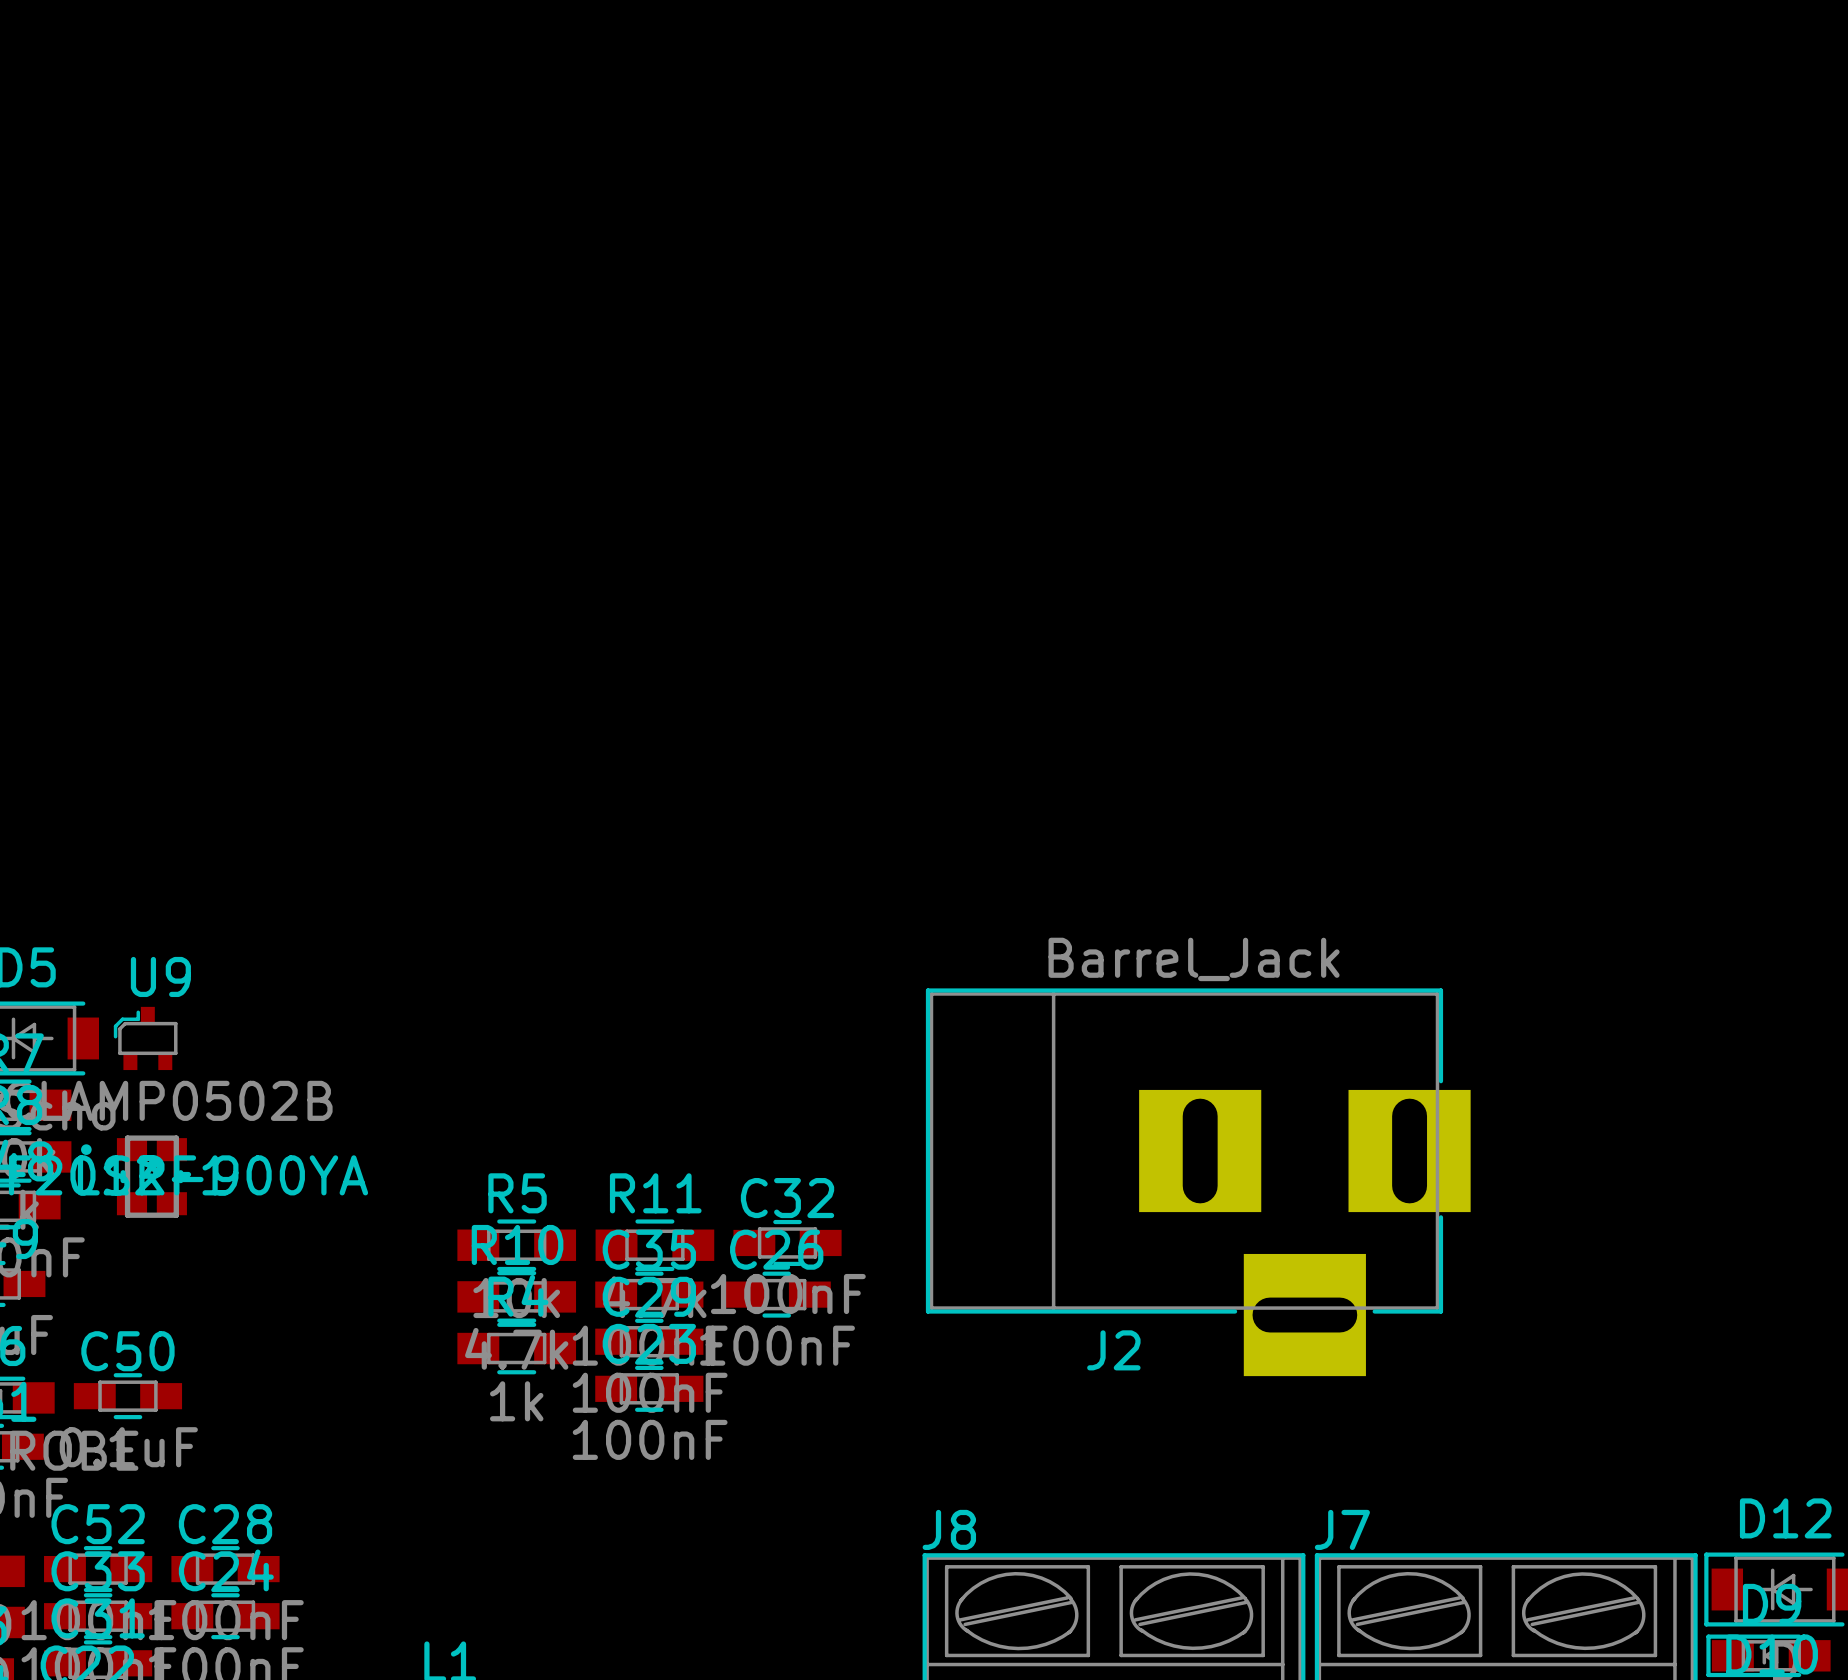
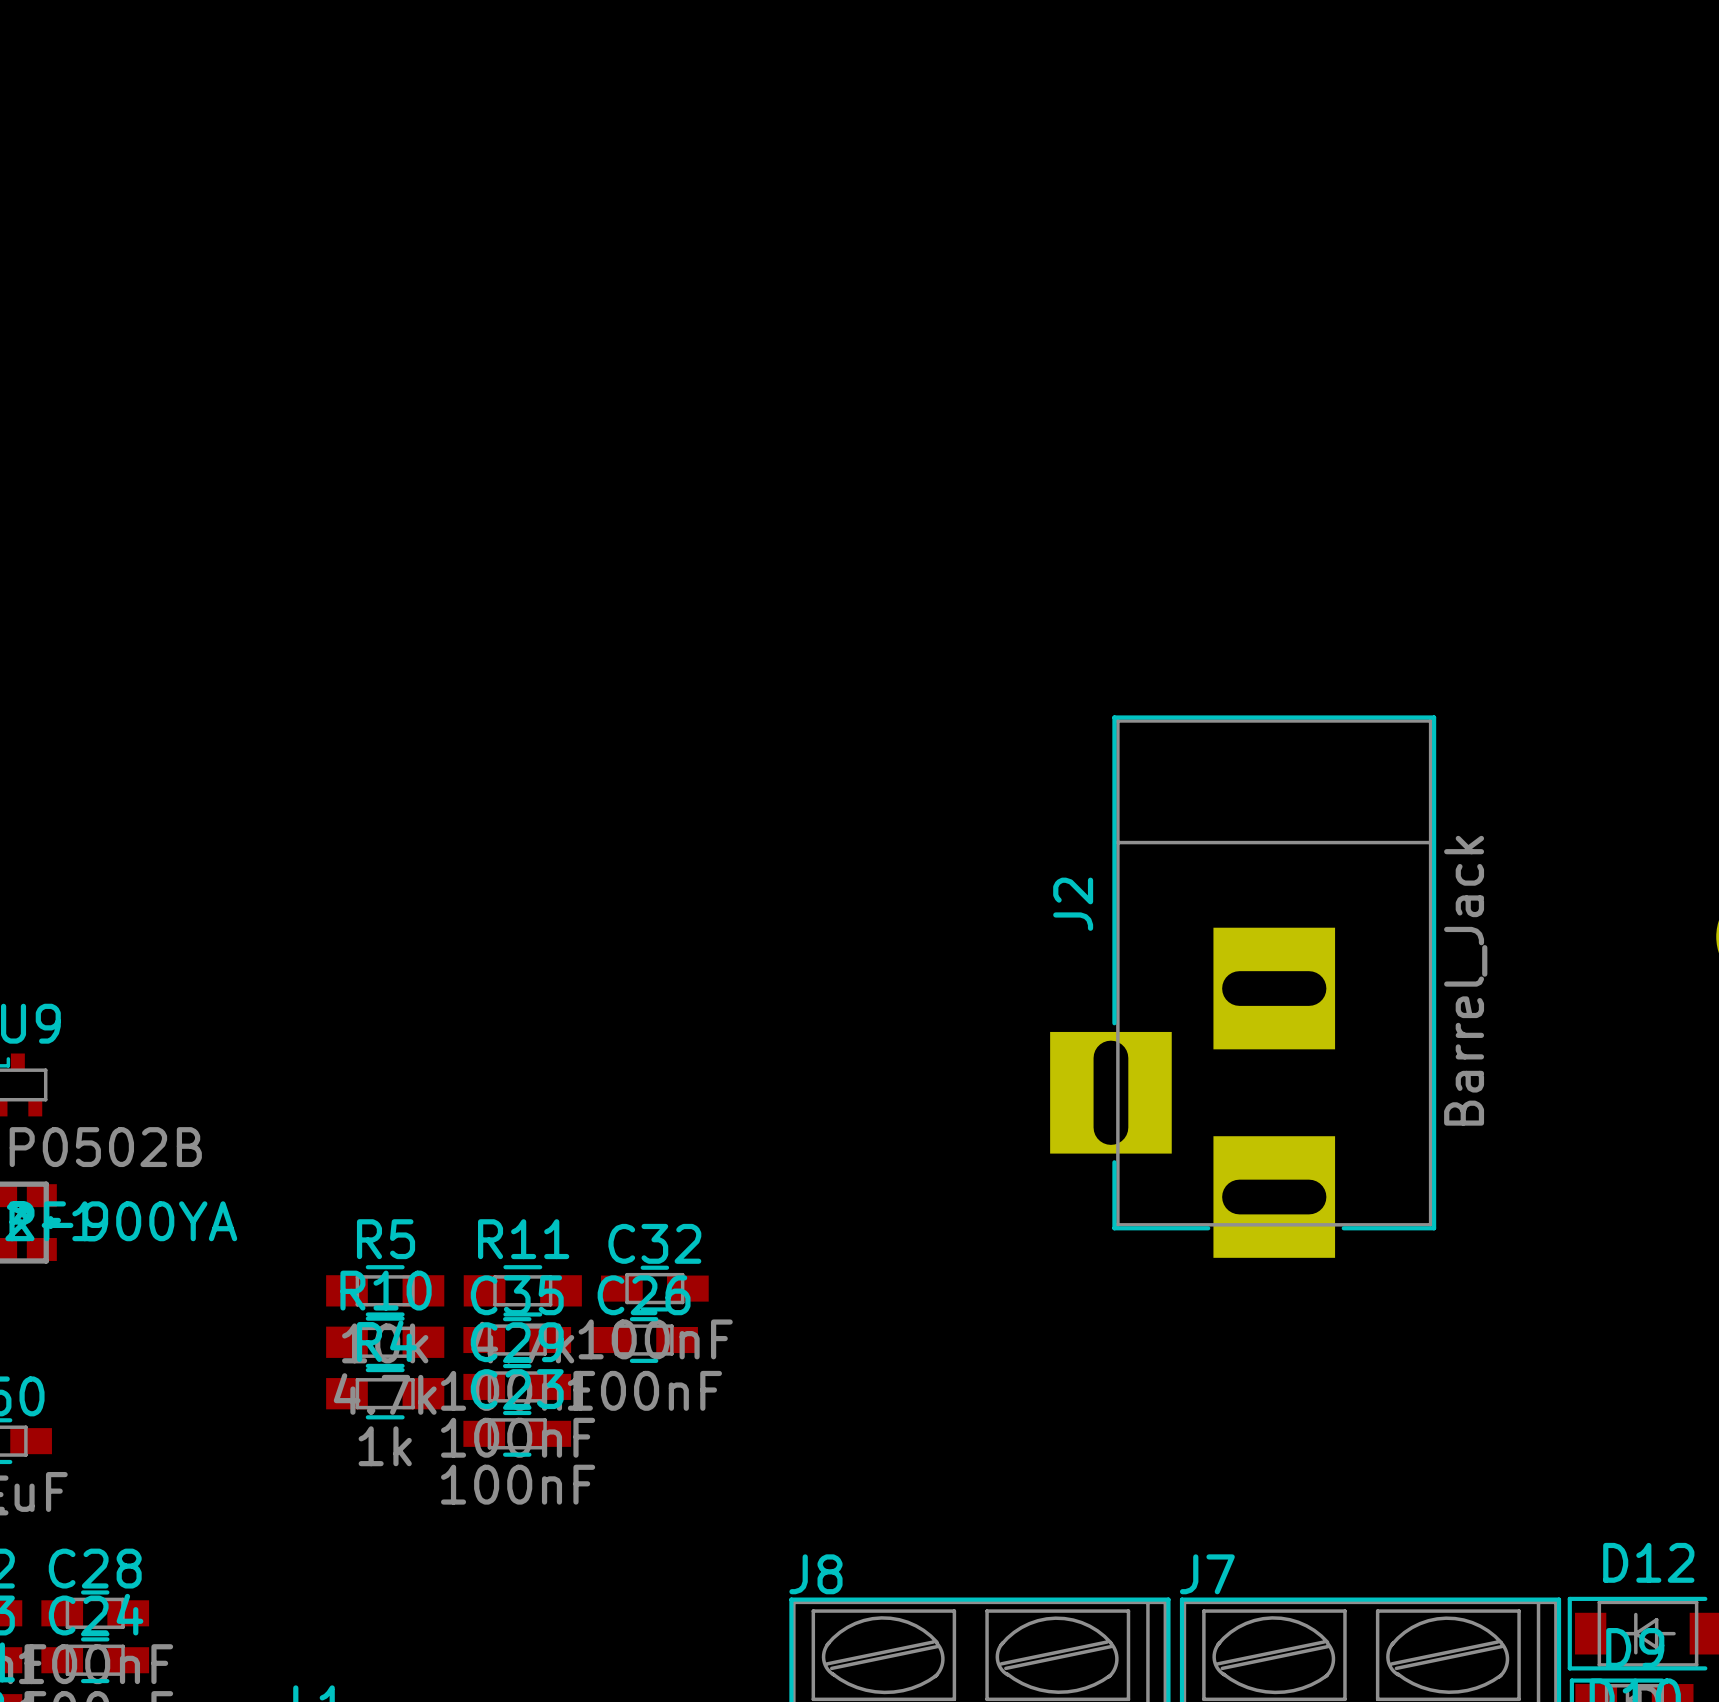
J2 rotation: 0° (1198, 1182) -> 90° clockwise (1243, 986)

